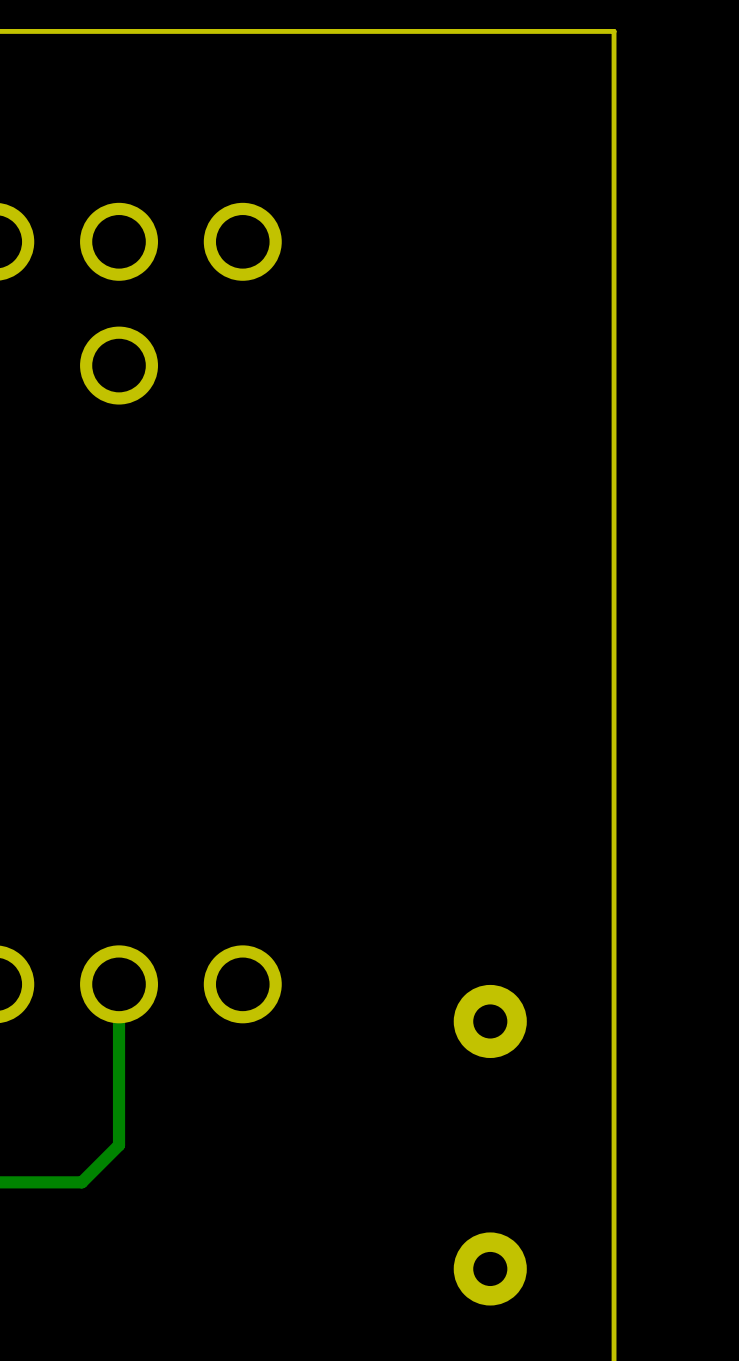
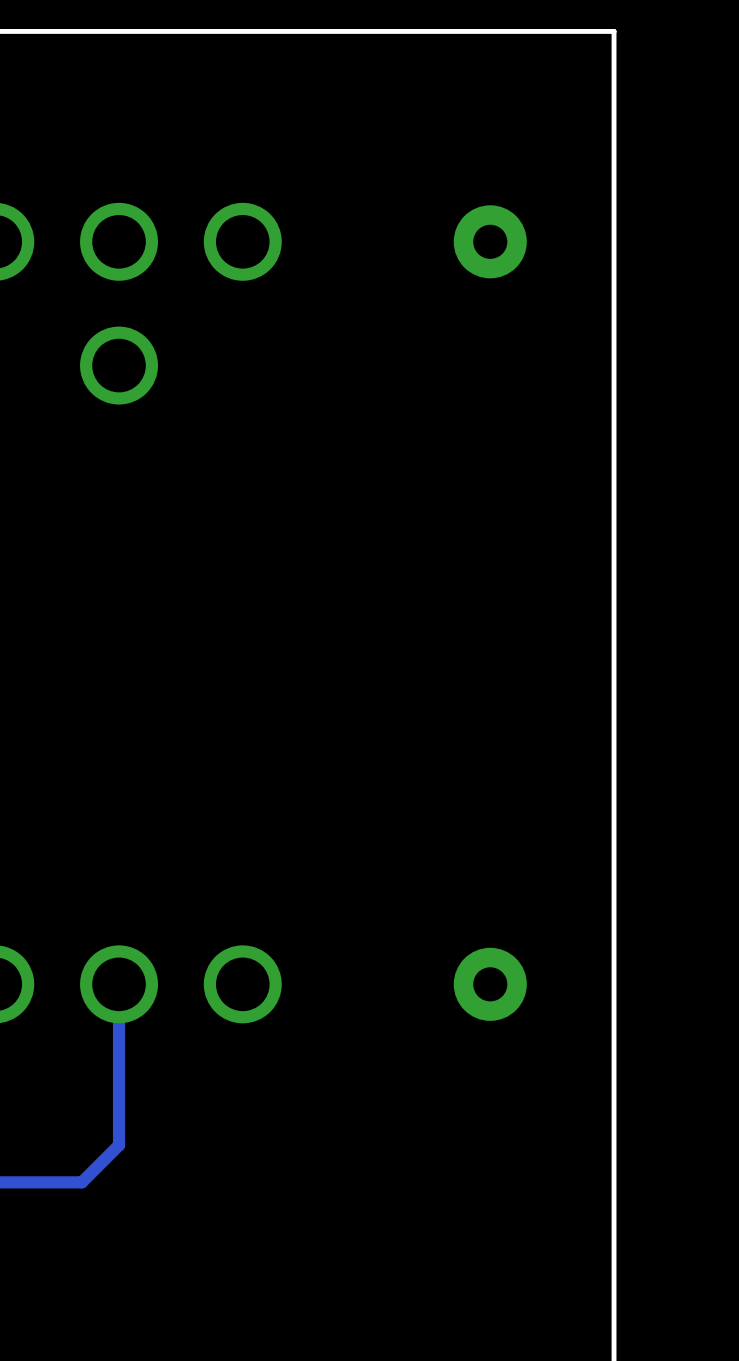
part position: (490, 1021) -> (490, 984)
part position: (490, 1268) -> (490, 241)

